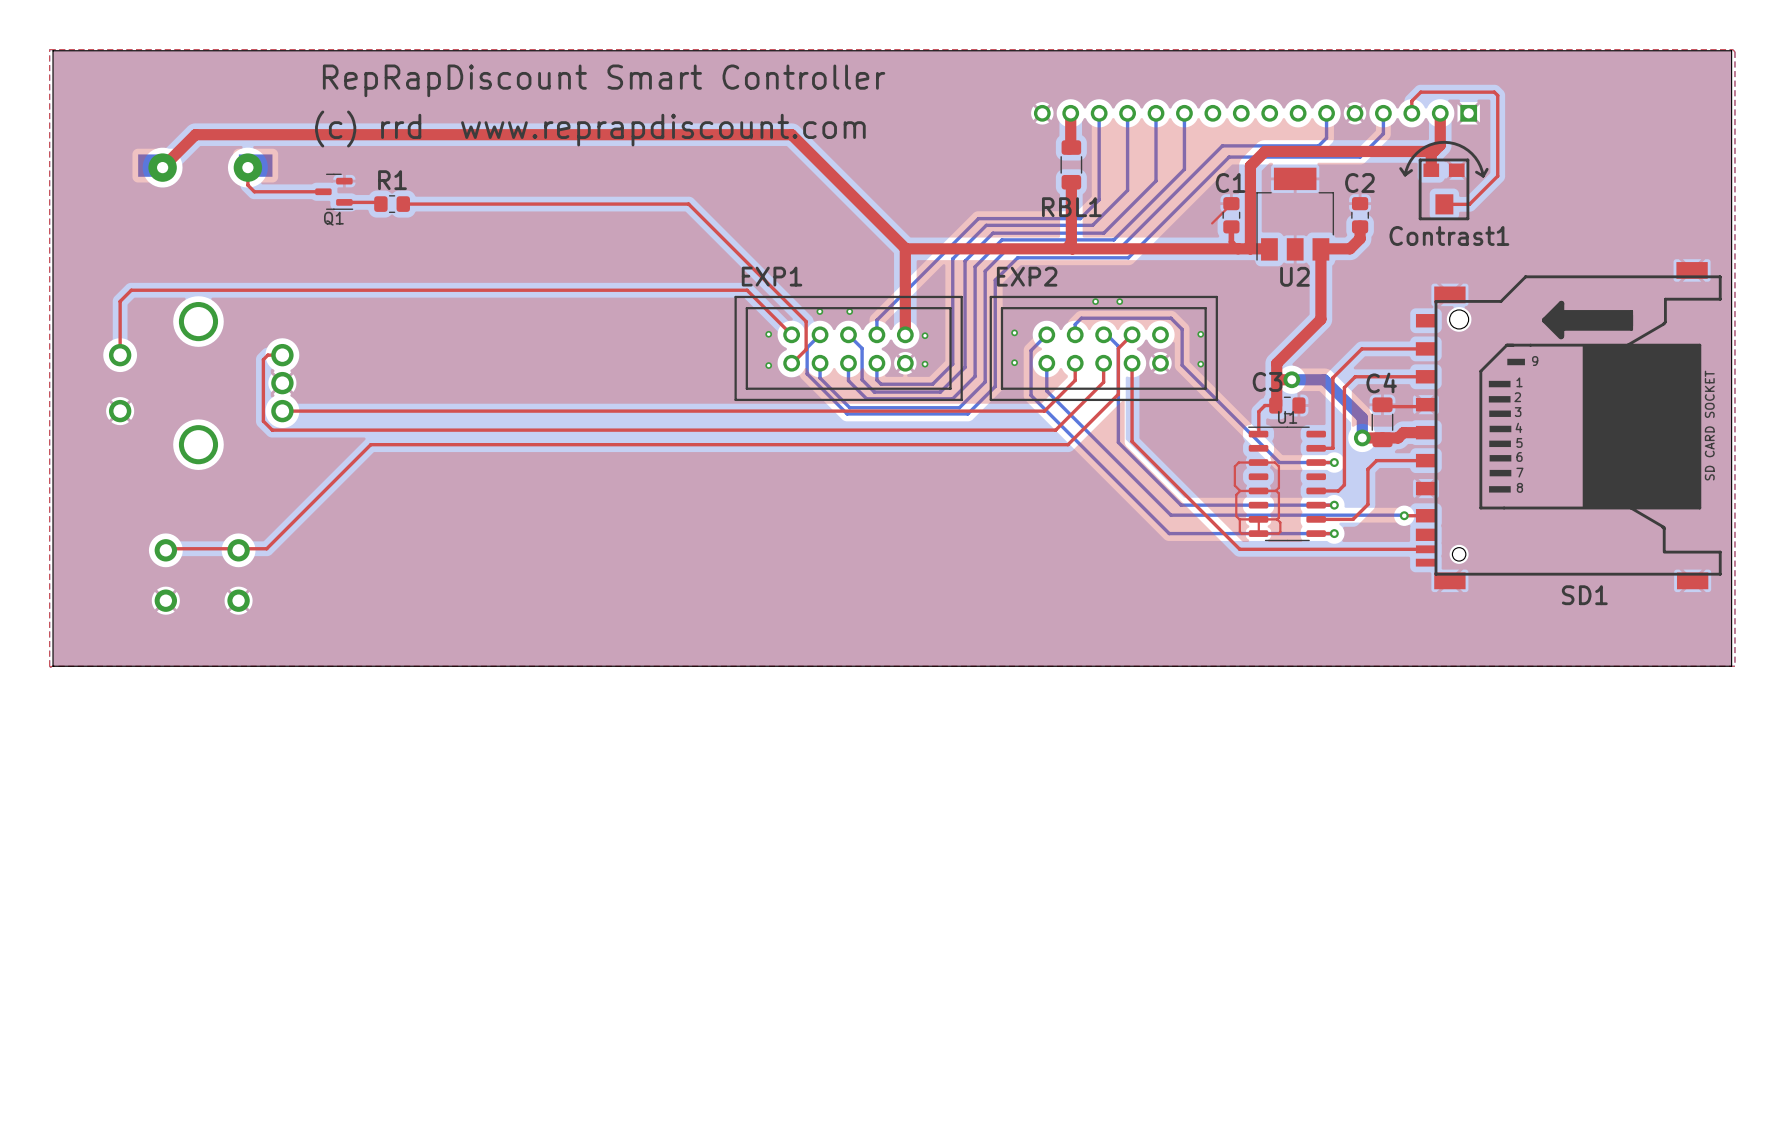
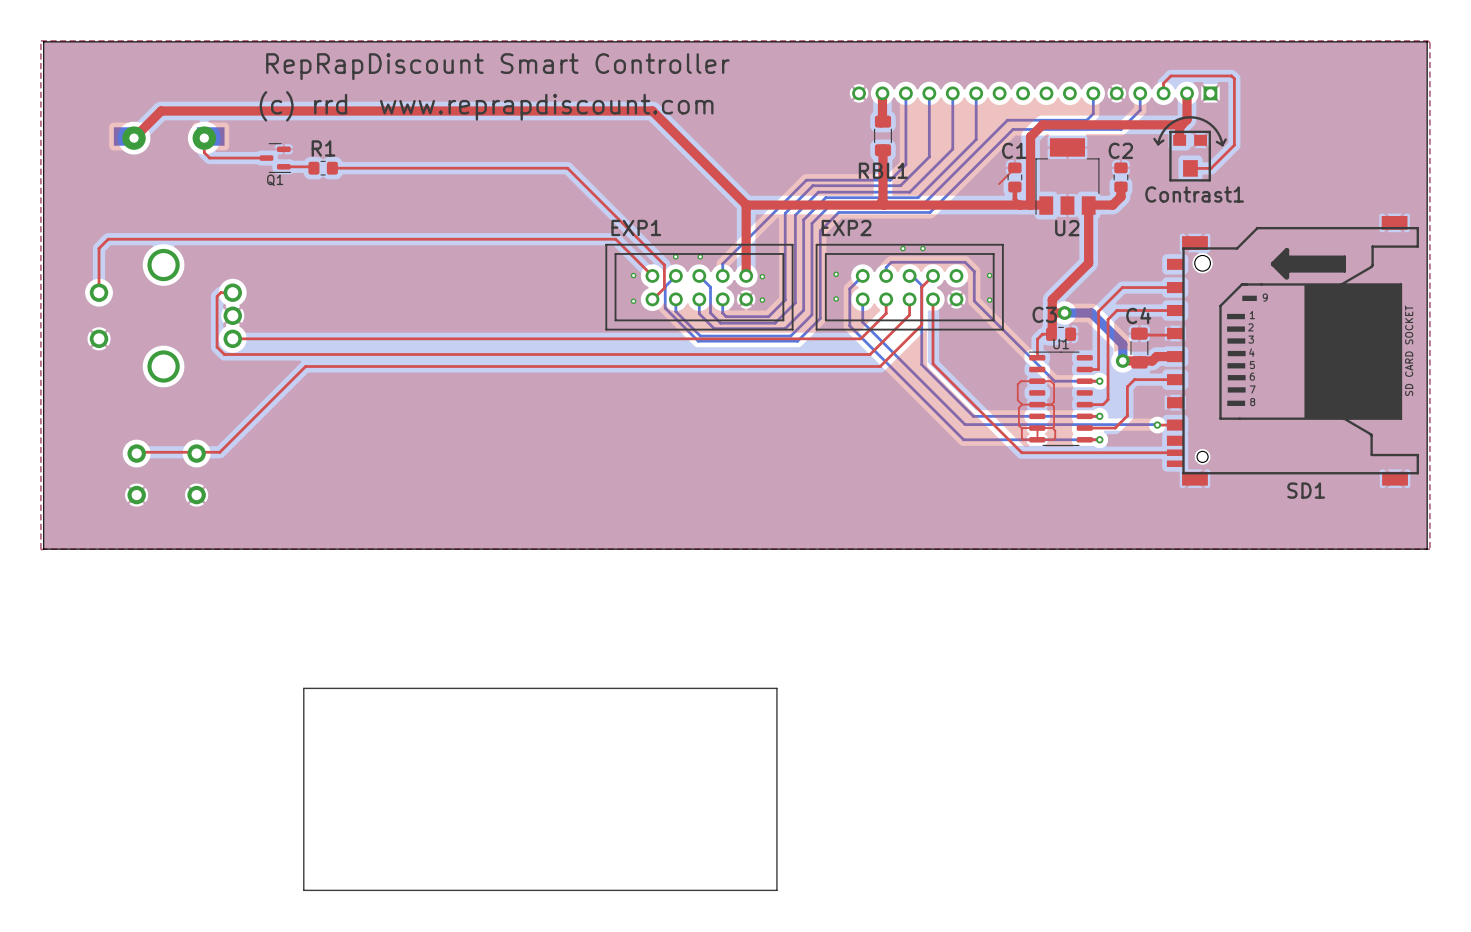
line: none -> (303, 688) (776, 688) (776, 890) (303, 890) (303, 688)

